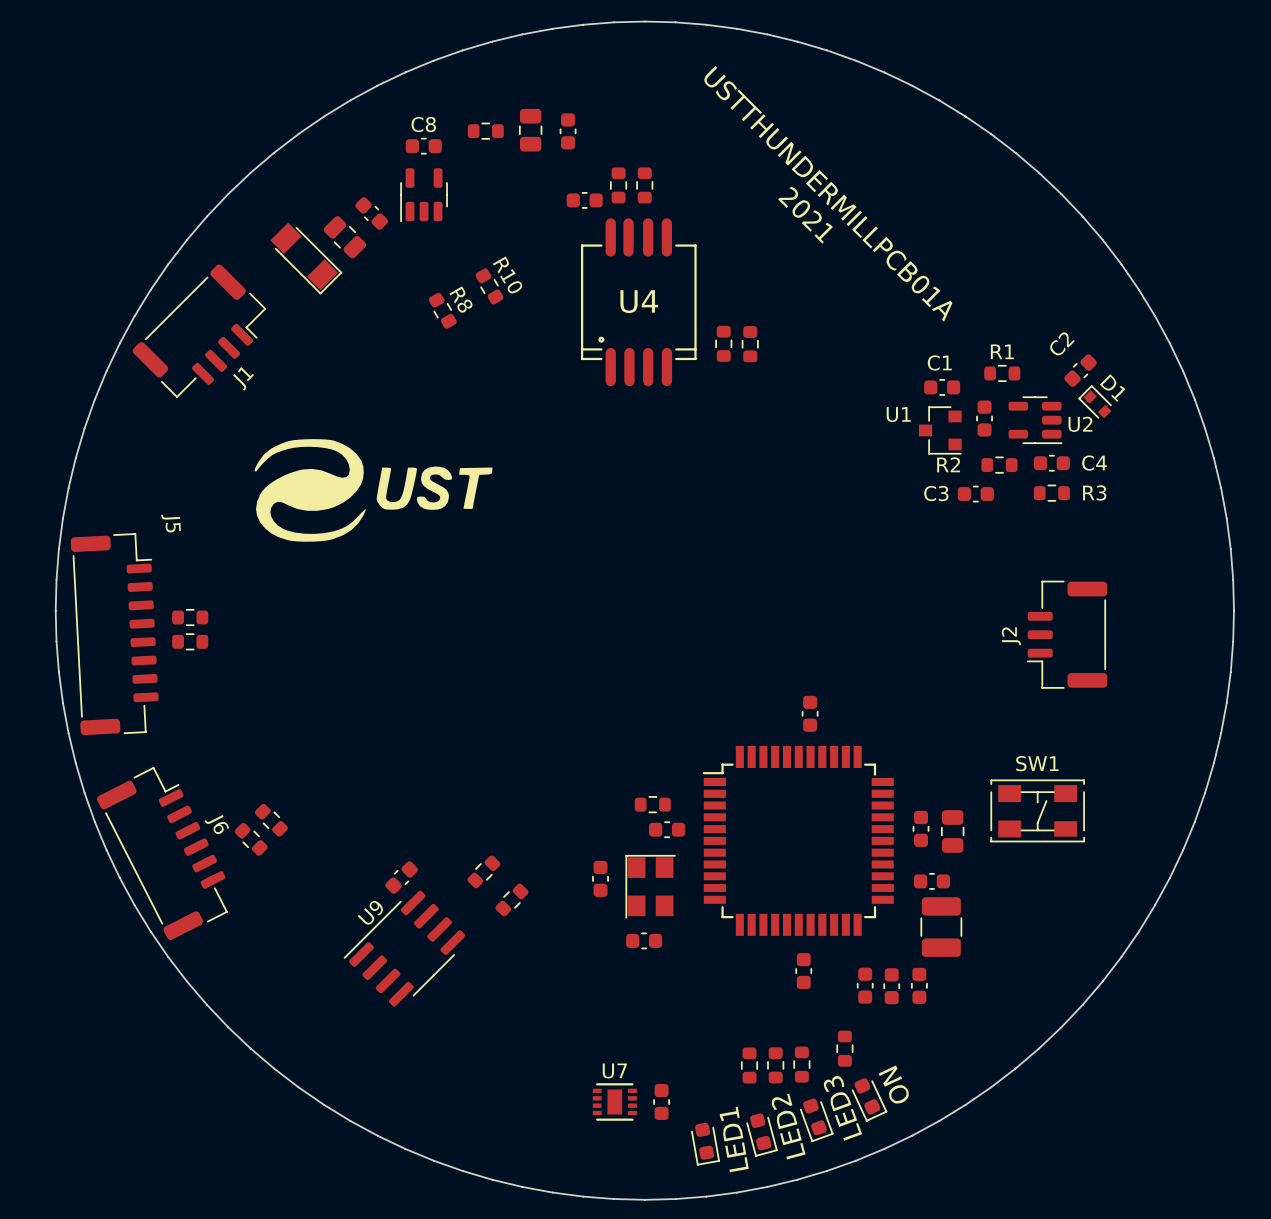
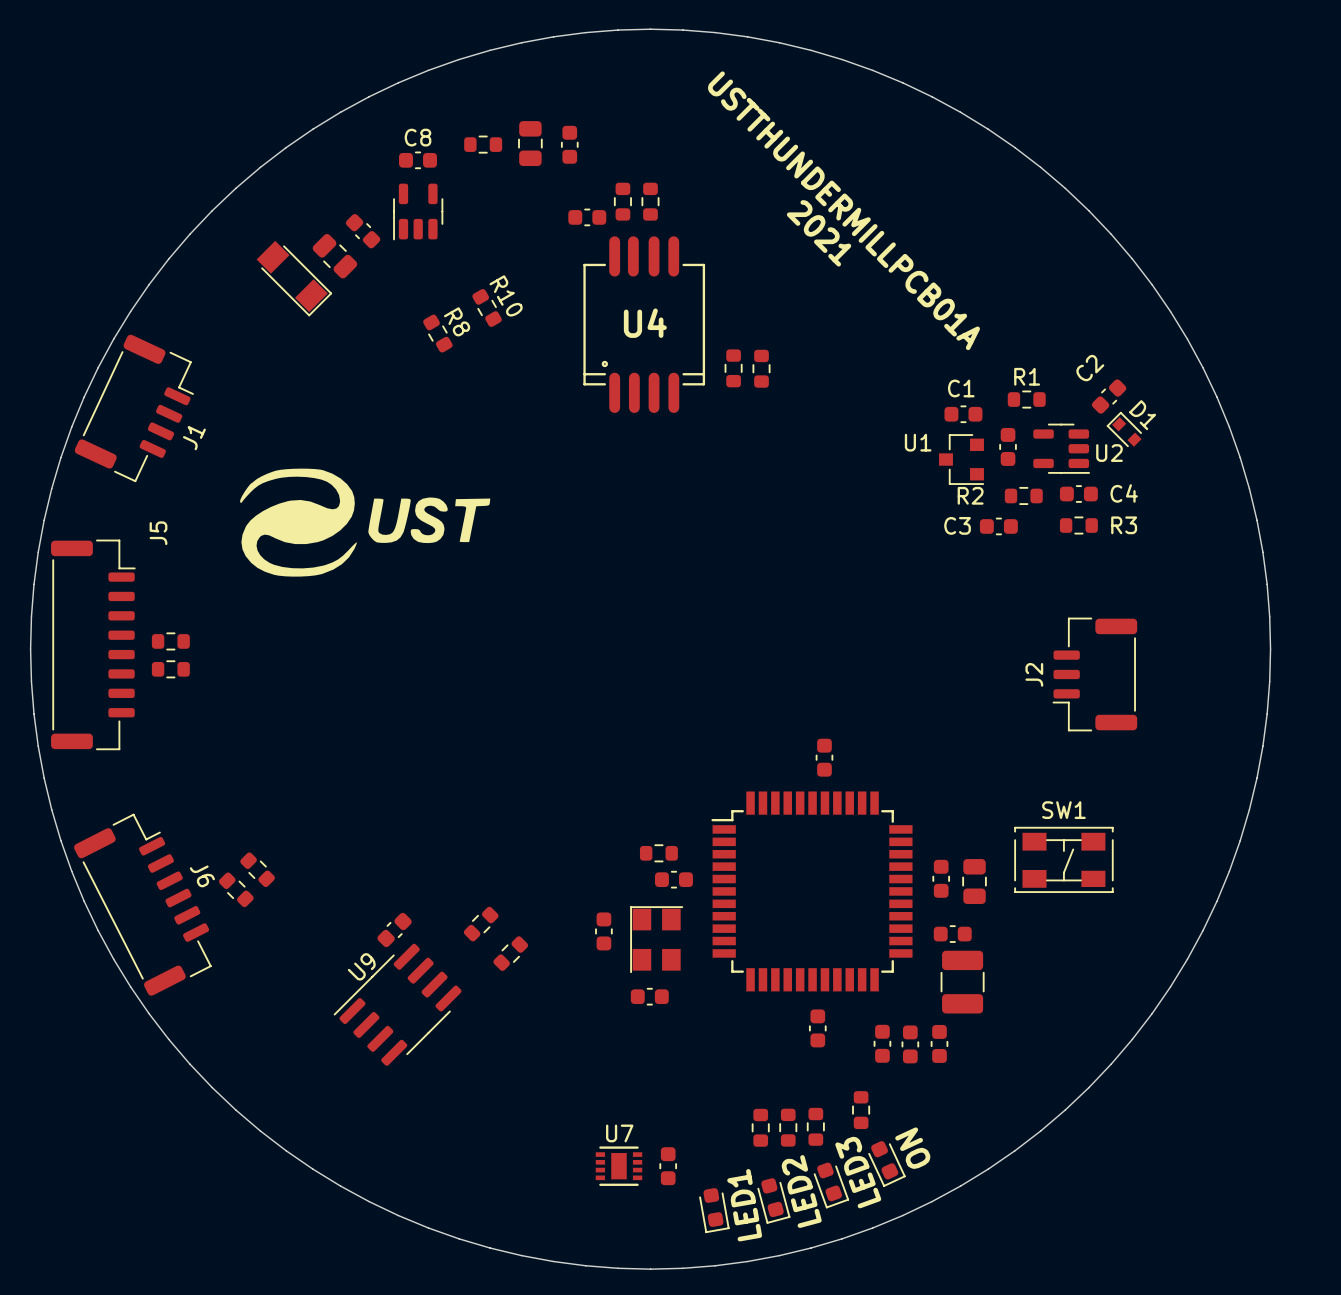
J1 rotation: 0° (199, 331) -> 20° counterclockwise (134, 408)
part: none -> (170, 641)
part: (190, 617) -> none
part: none -> (170, 669)
J5 rotation: 0° (114, 634) -> 3° clockwise (93, 644)
part: (190, 641) -> none

